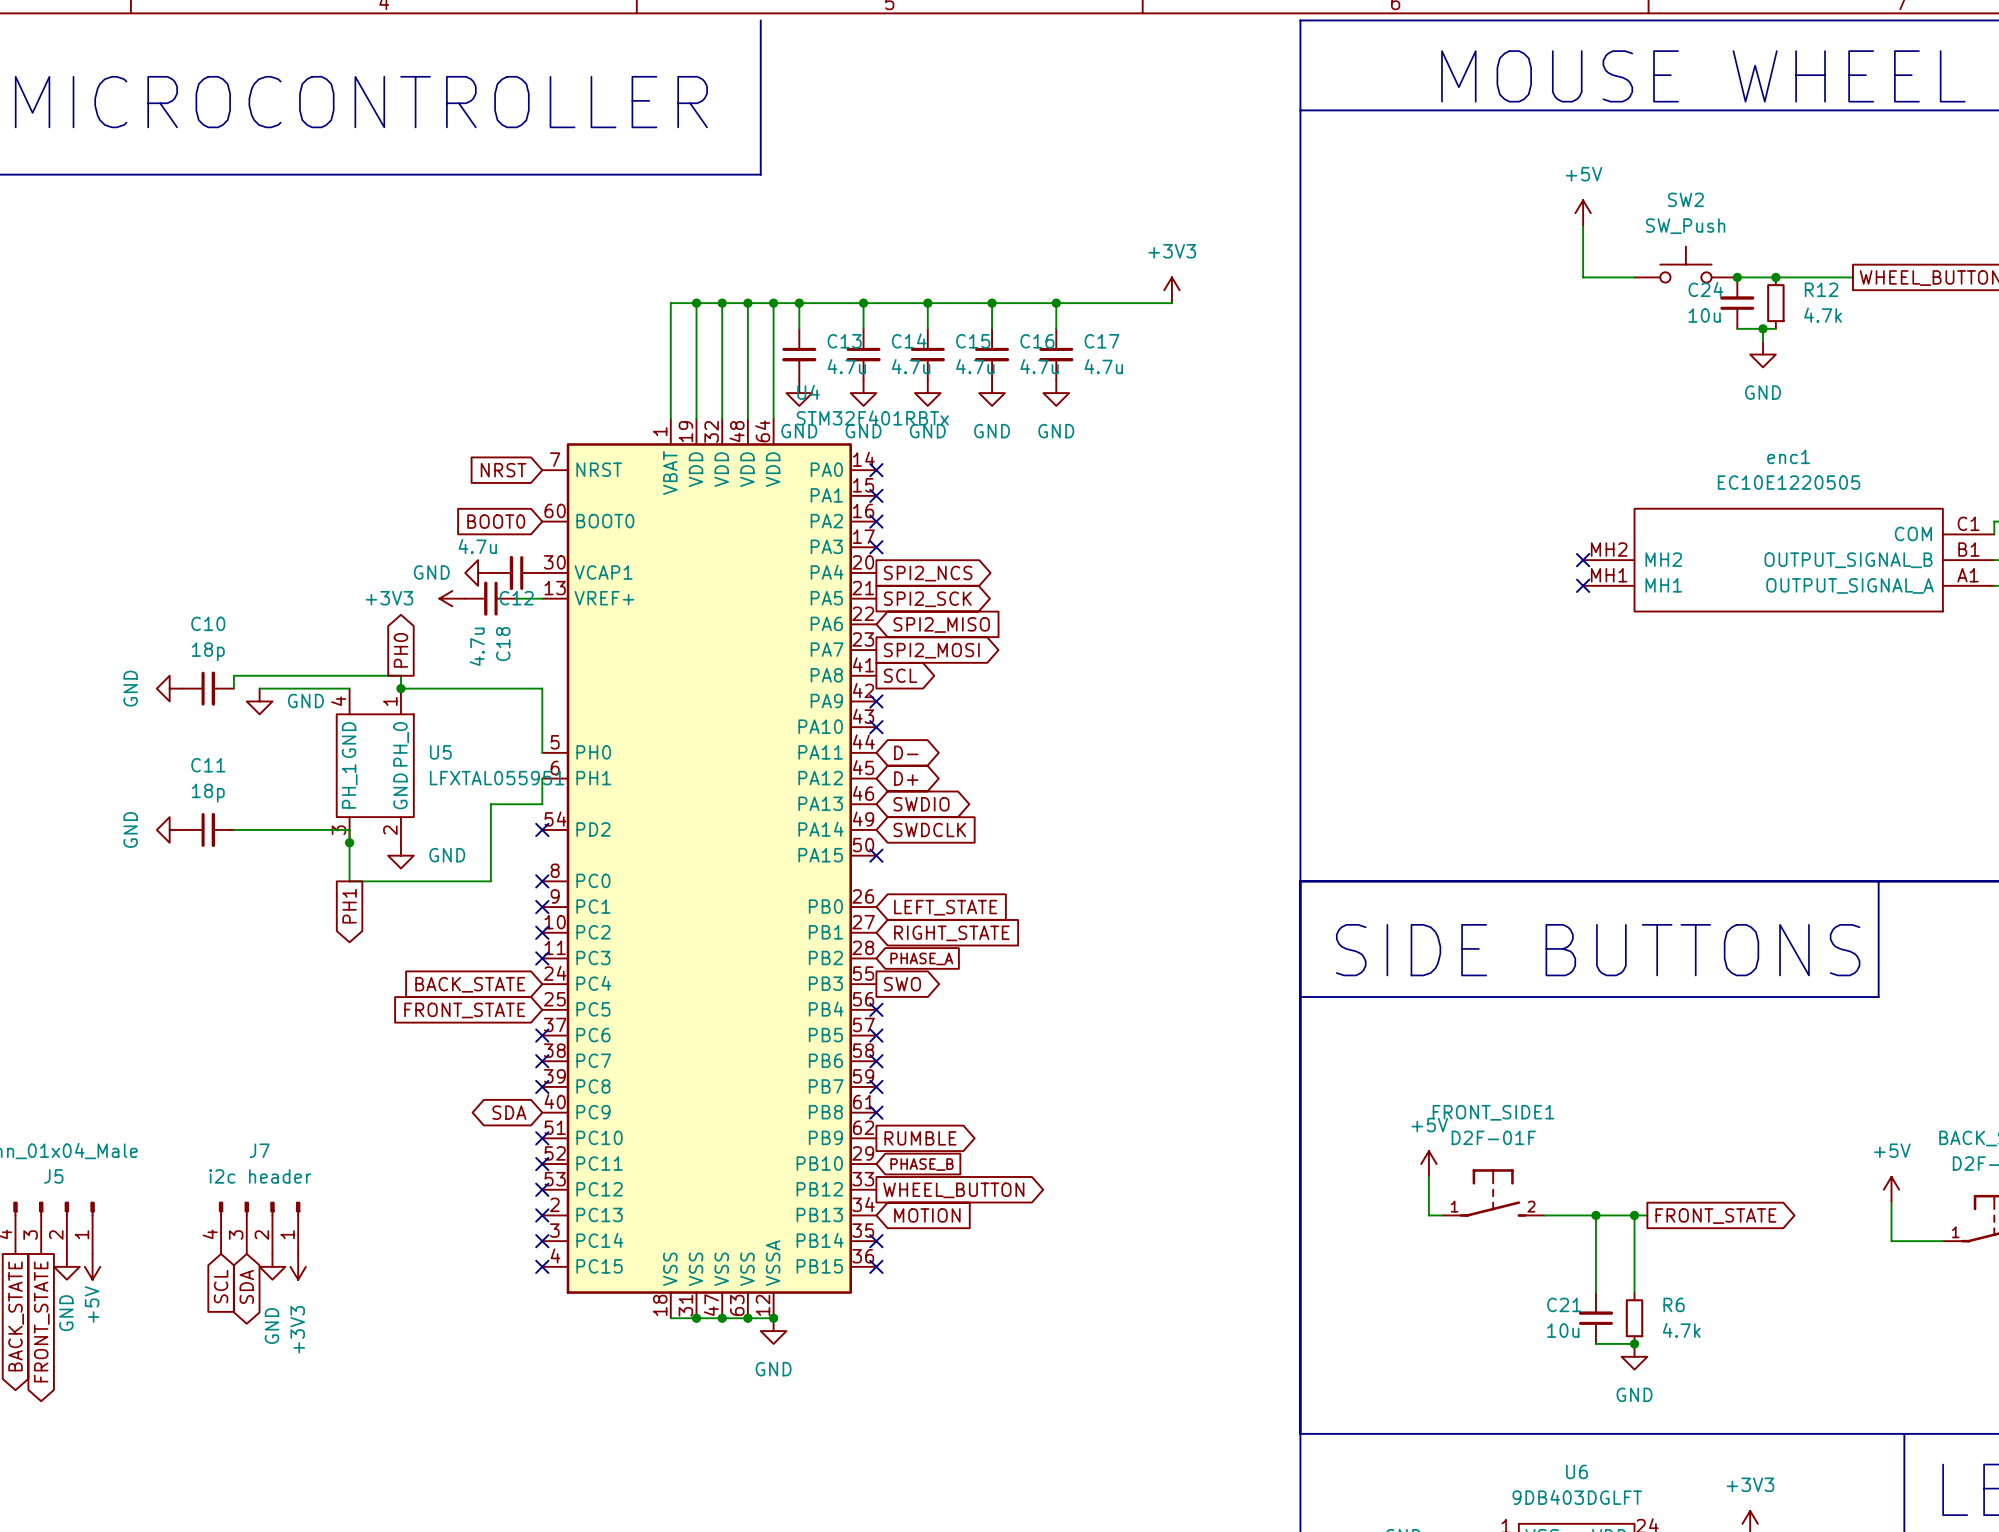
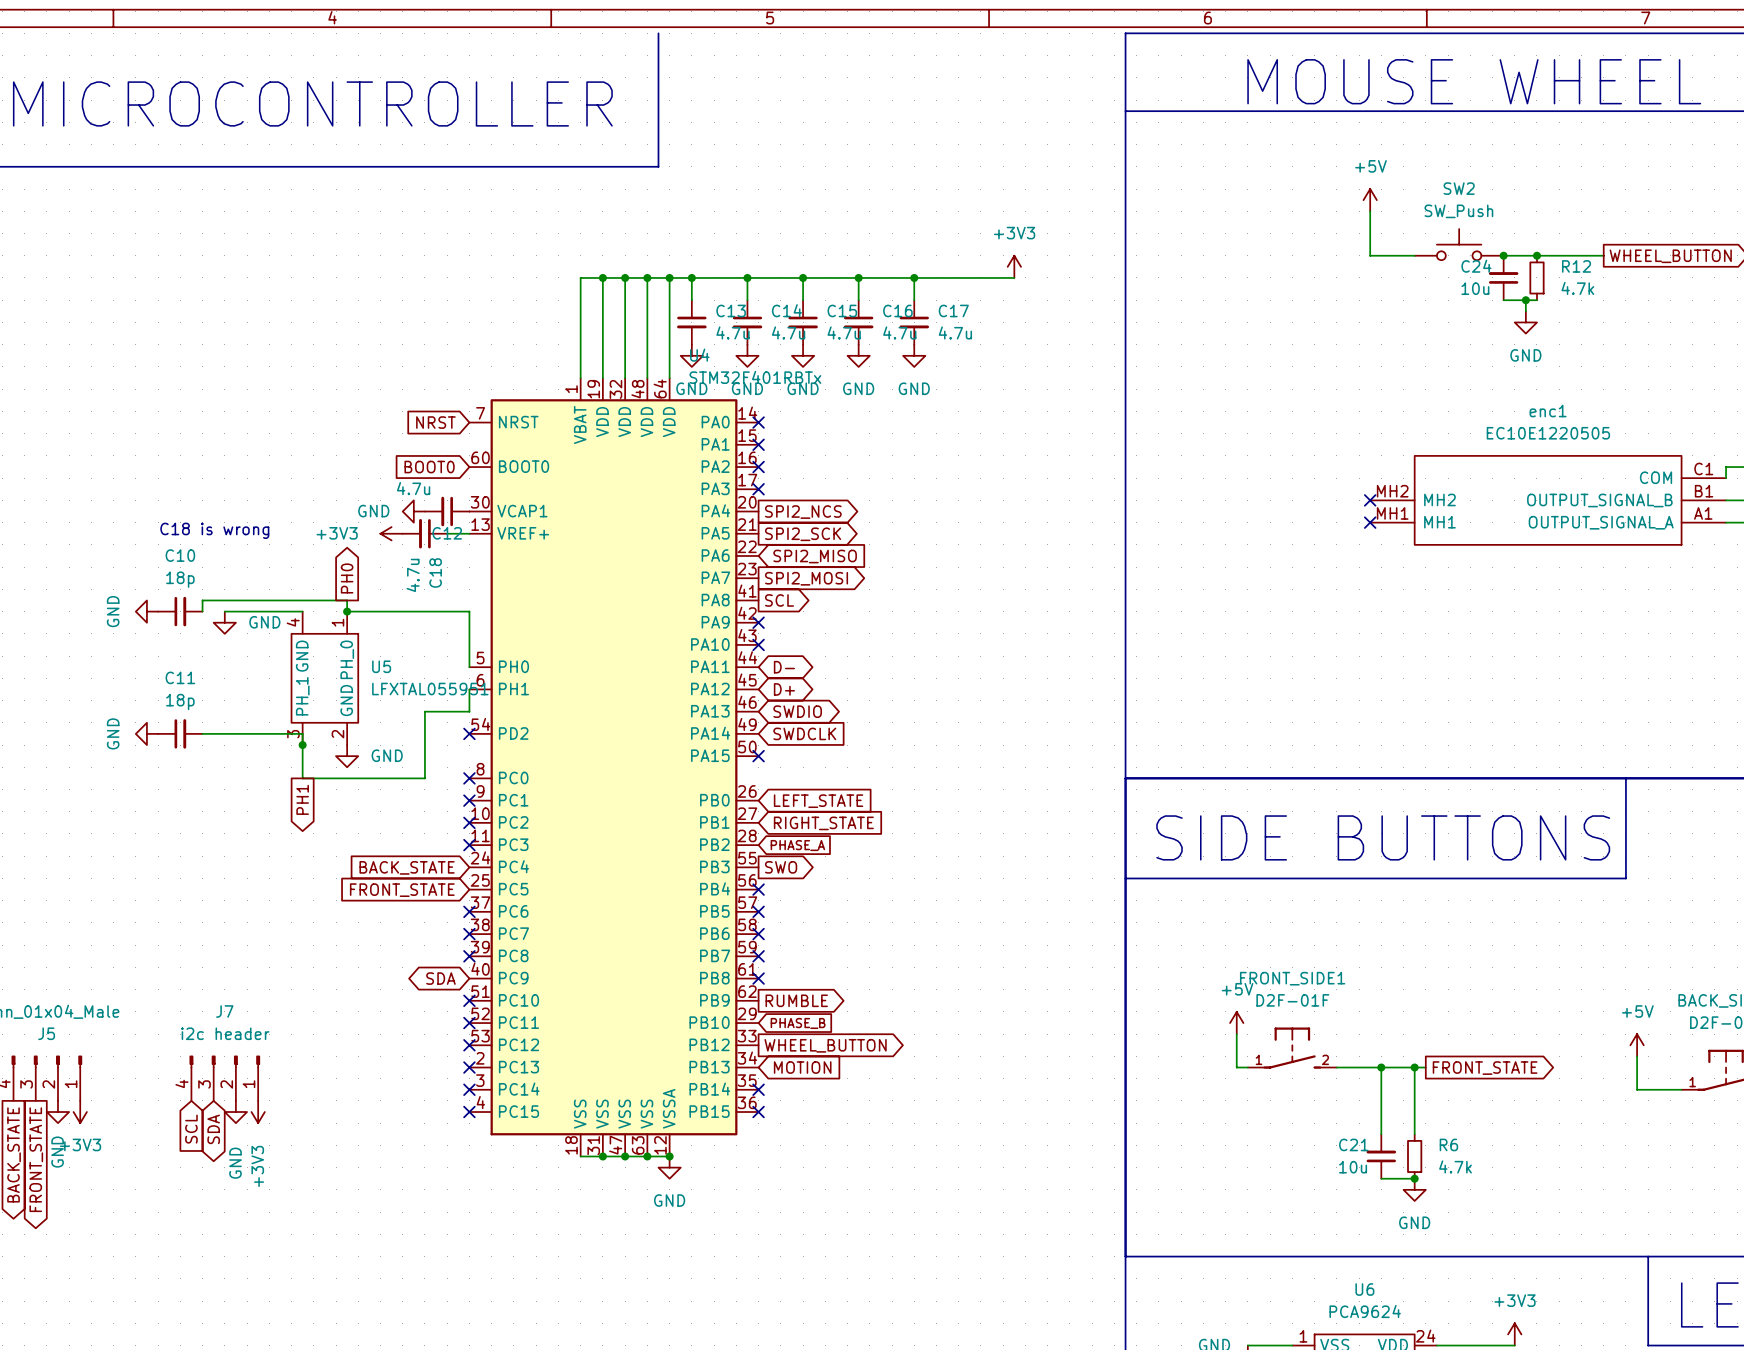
text: none -> C18 is wrong (214, 530)
power symbol: +5V (92, 1266) -> +3V3 (80, 1112)
U6 value: 9DB403DGLFT (1577, 1497) -> PCA9624 (1365, 1311)

